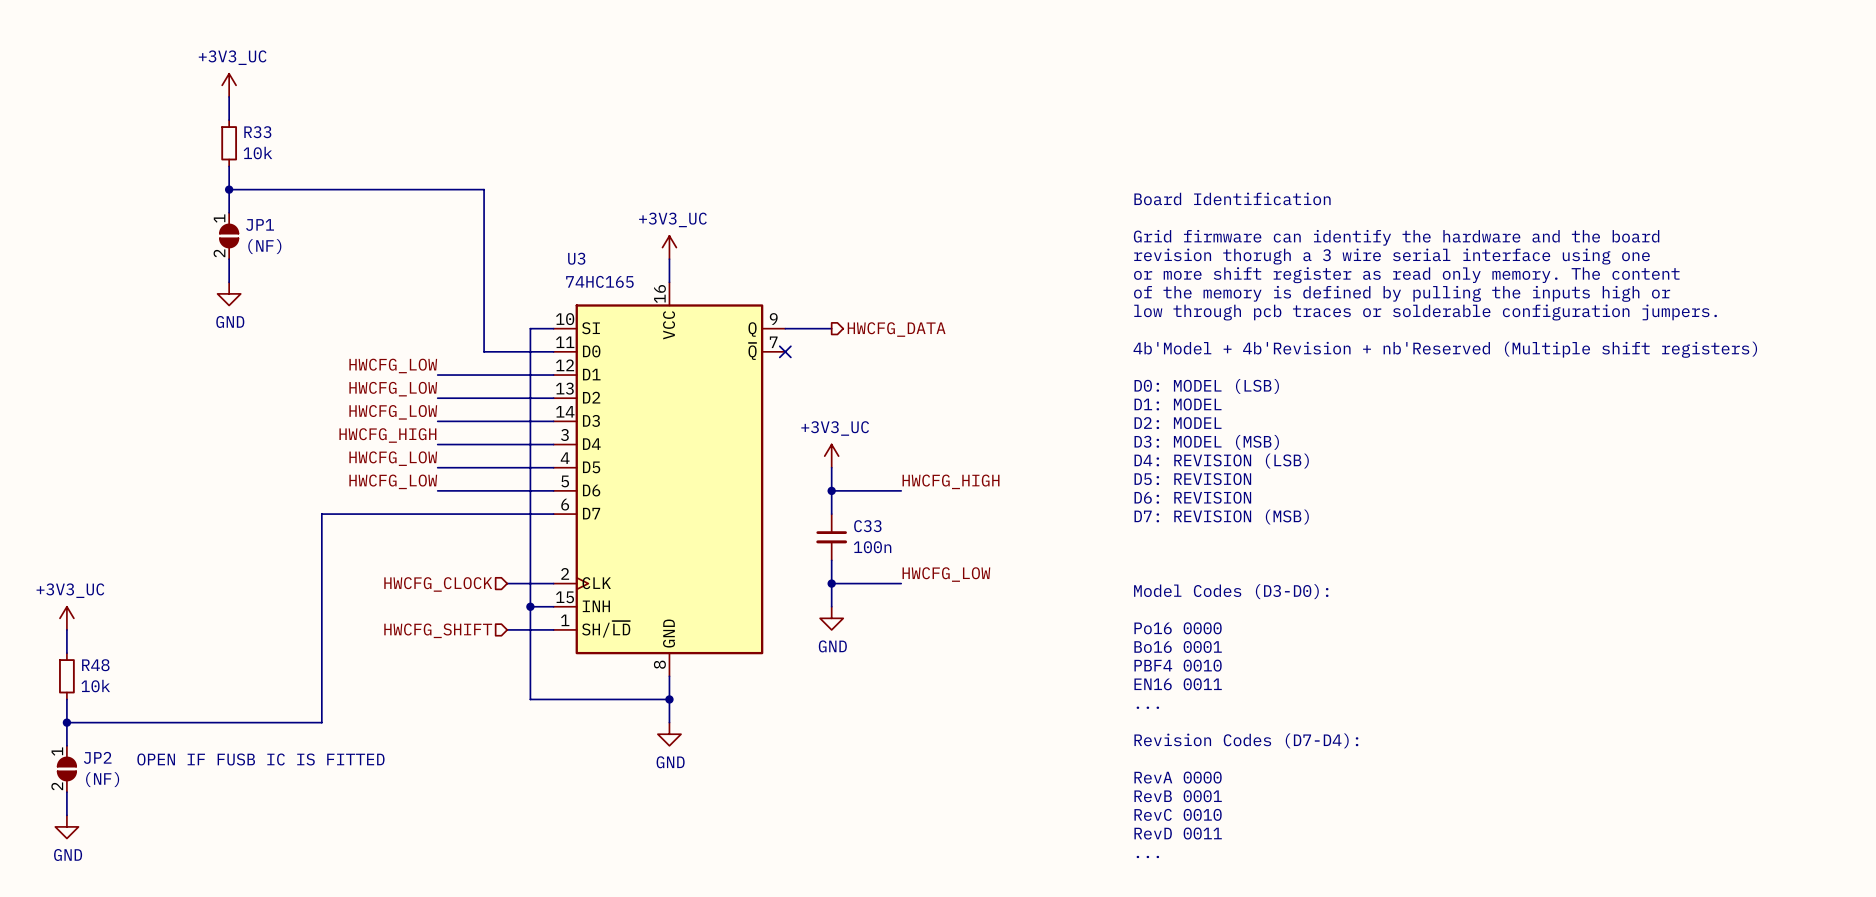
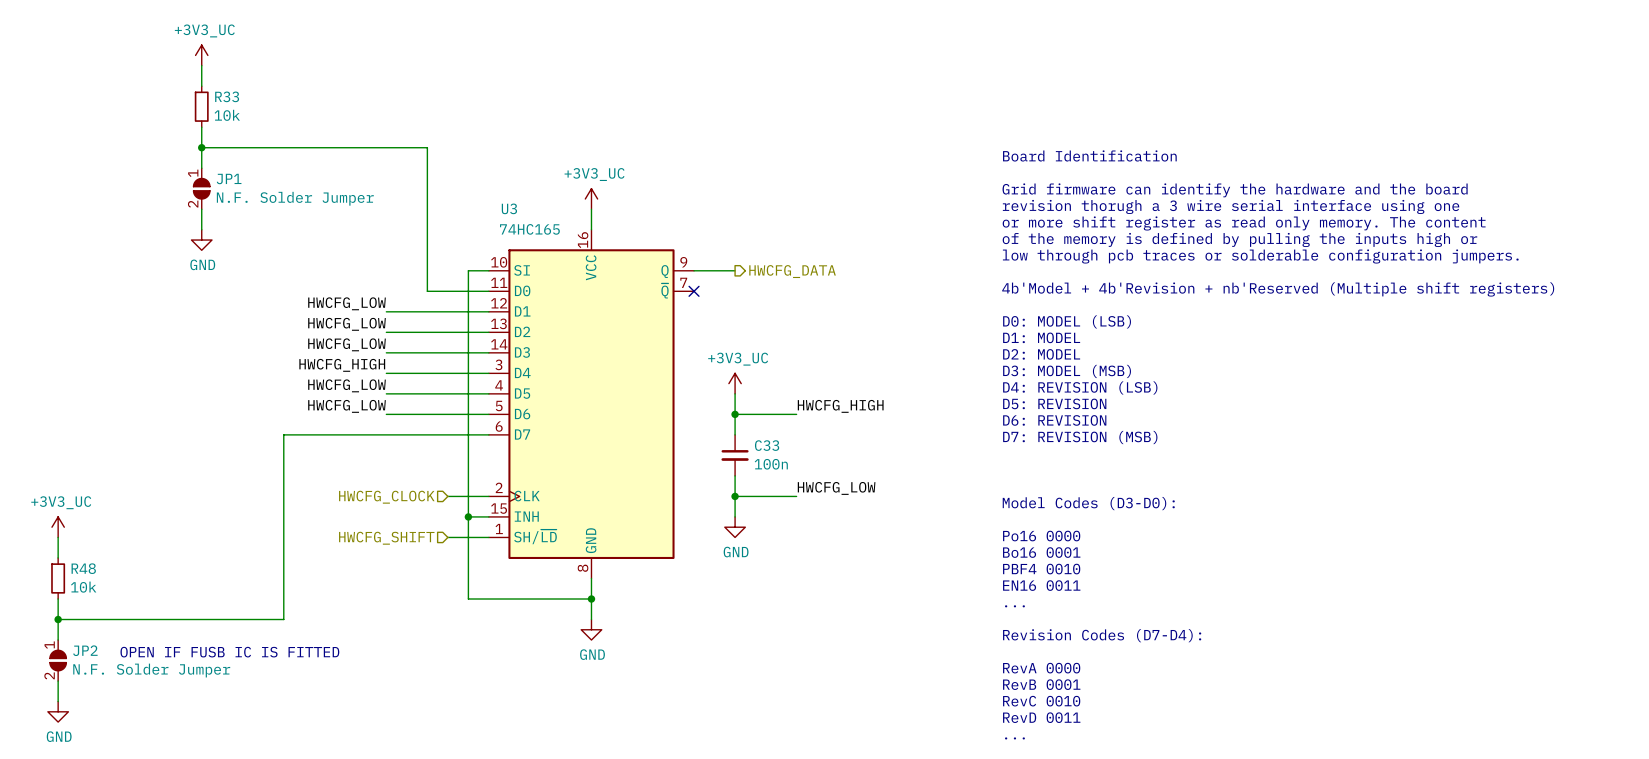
JP1 value: (NF) (264, 246) -> N.F. Solder Jumper (295, 198)
JP2 value: (NF) (102, 779) -> N.F. Solder Jumper (151, 670)

